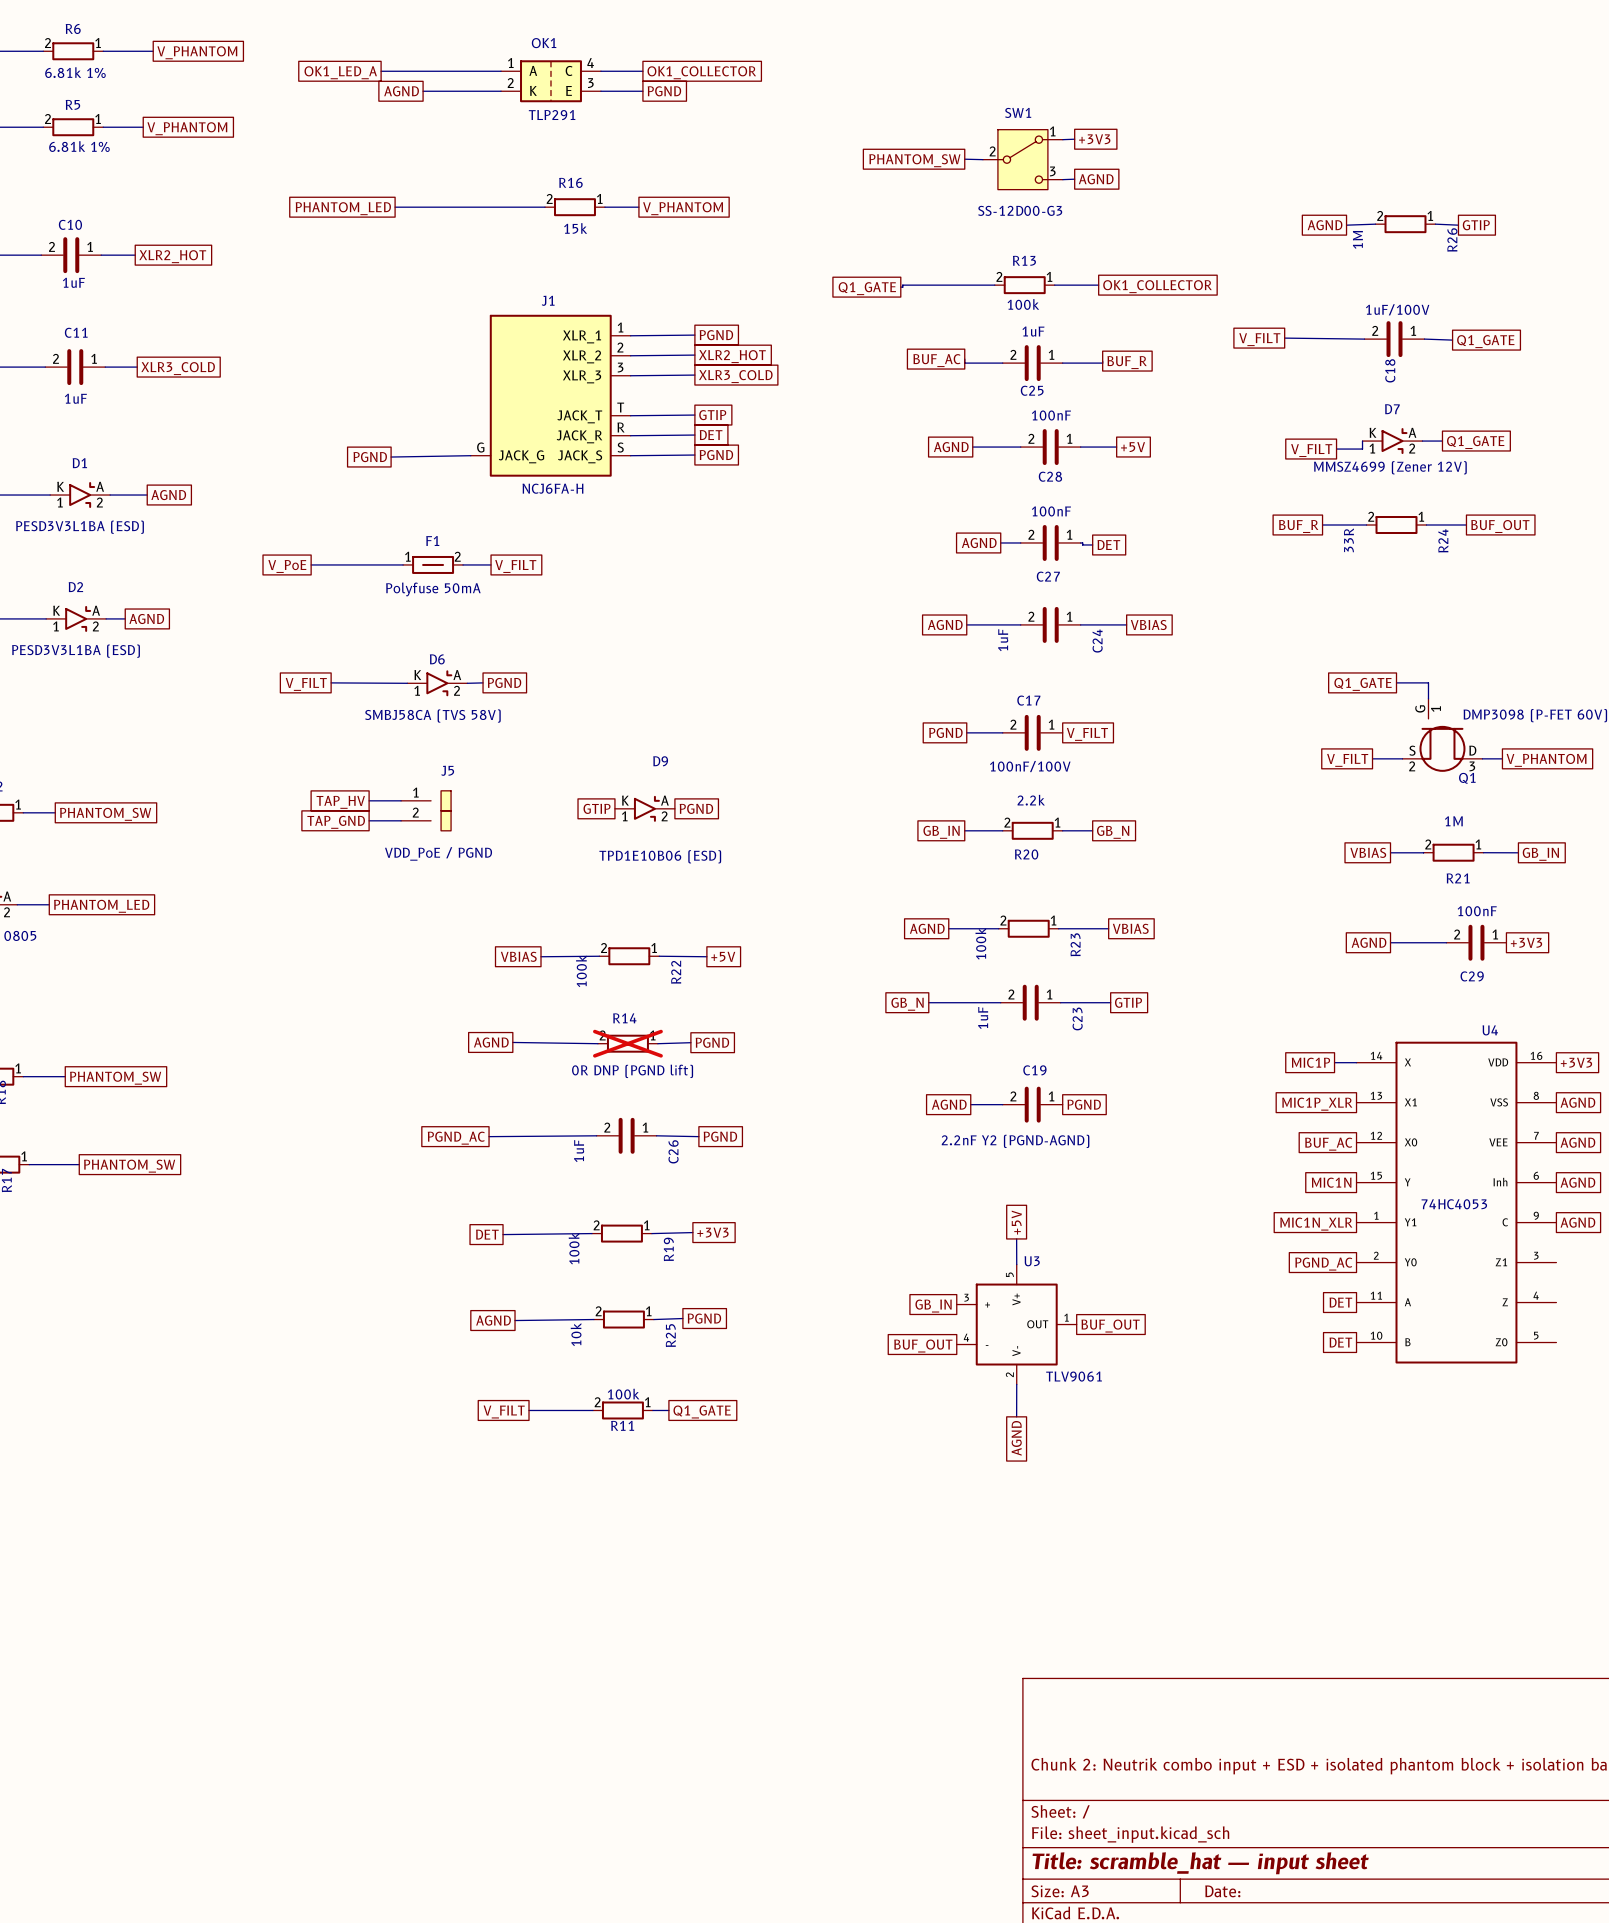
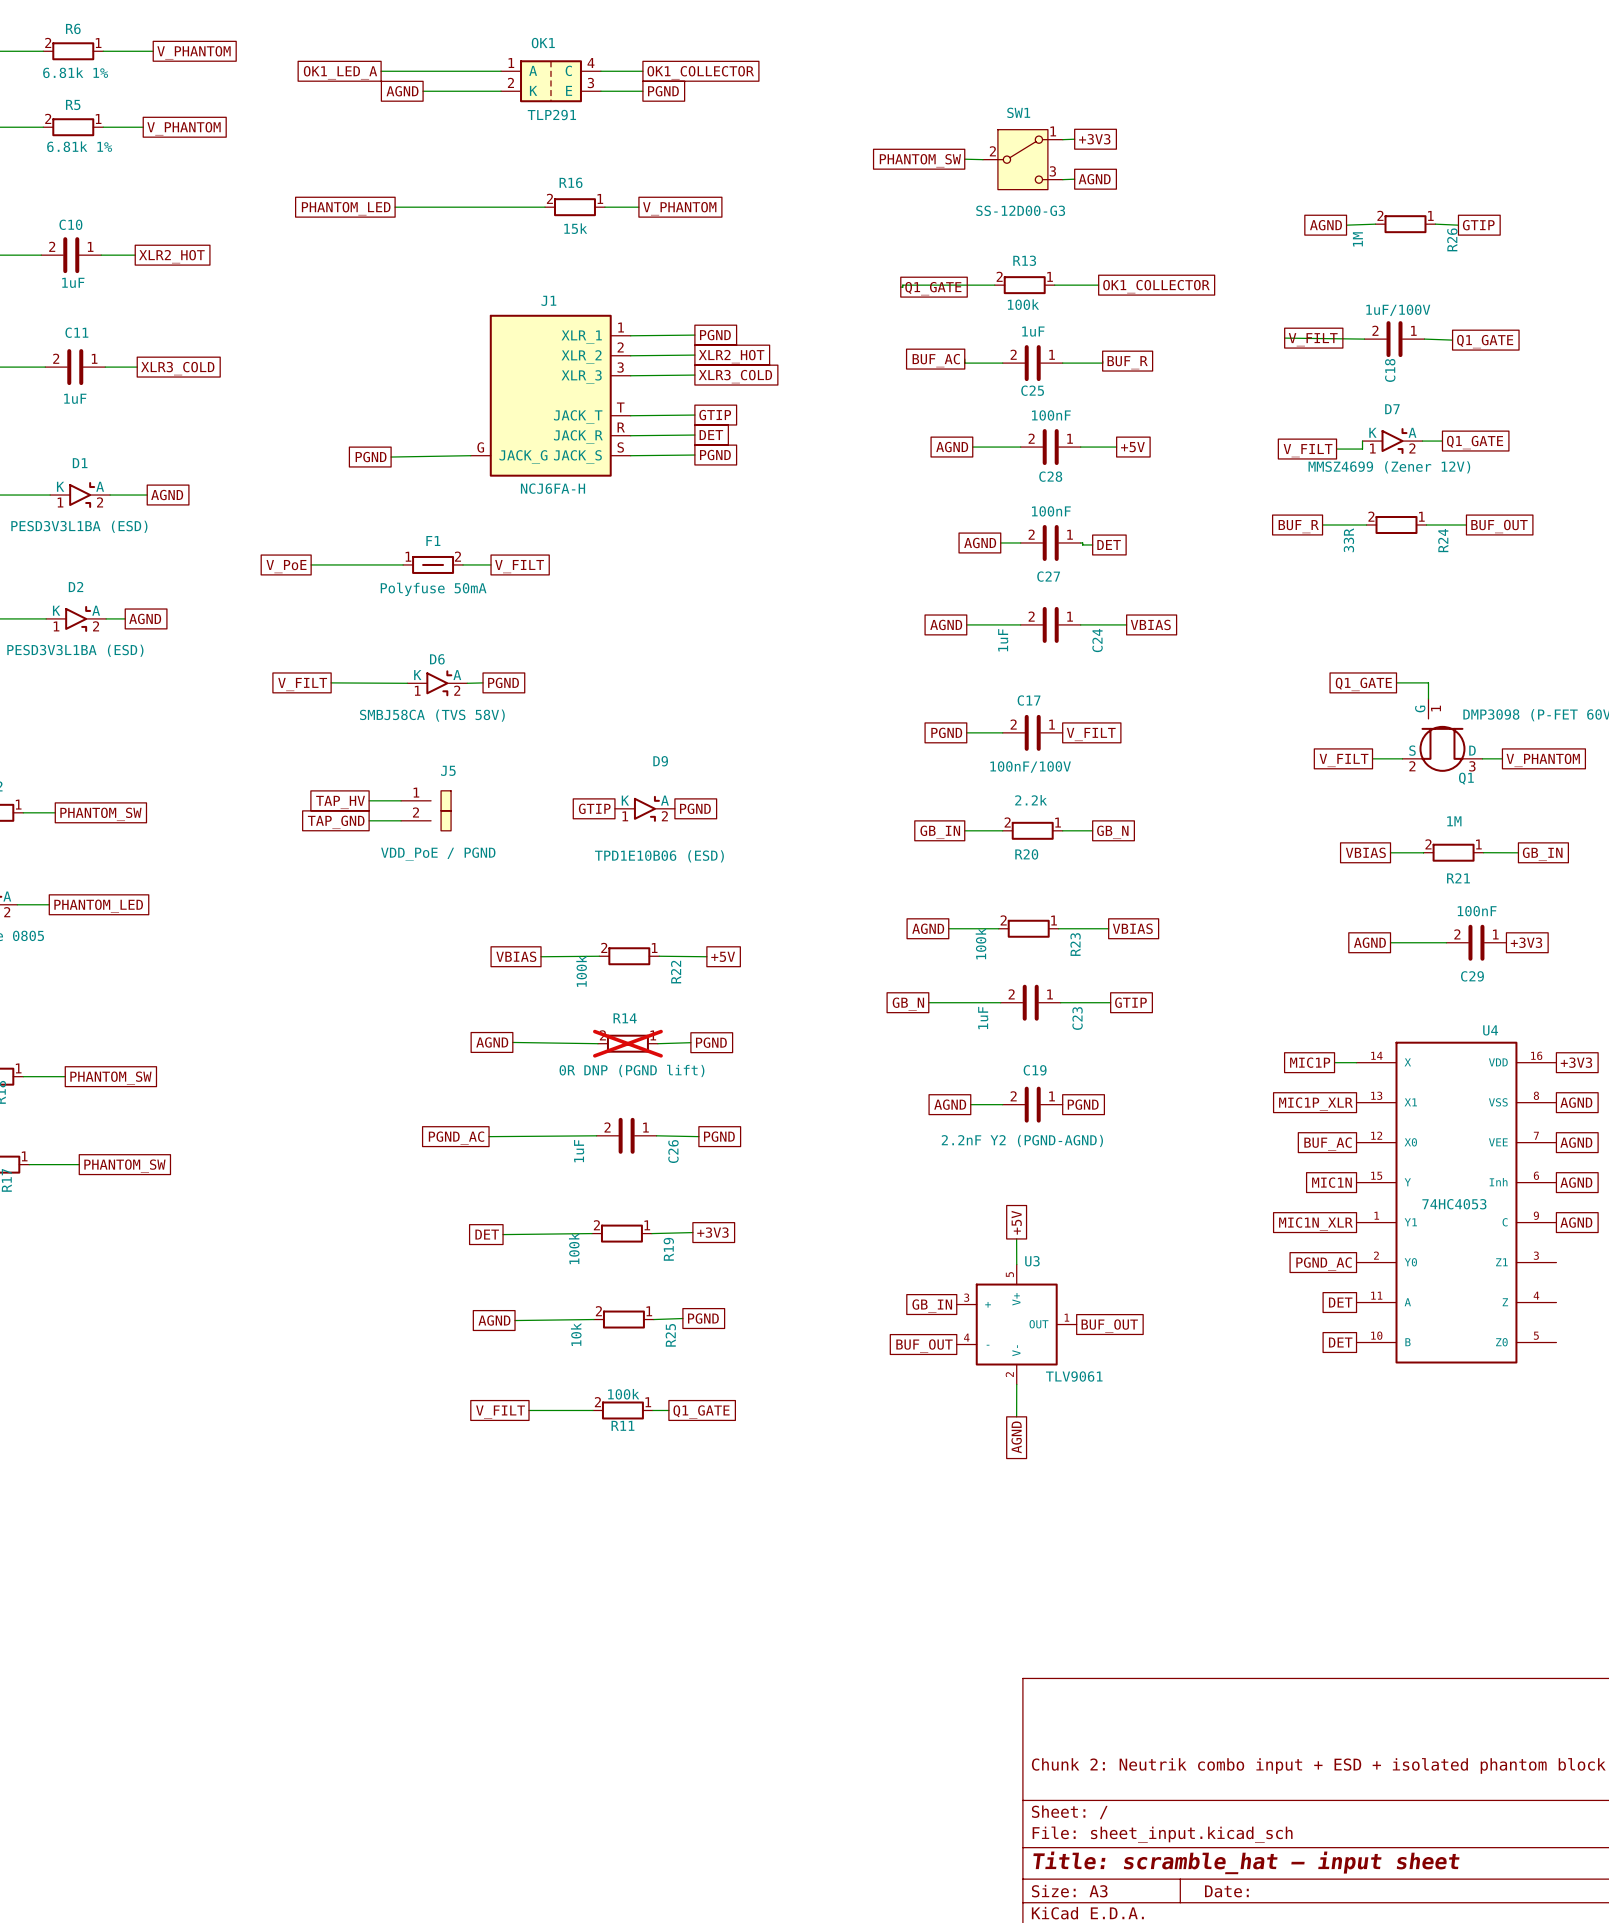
global label rotation: 0° (867, 288) -> 180° (933, 288)
global label rotation: 0° (1259, 339) -> 180° (1313, 339)

